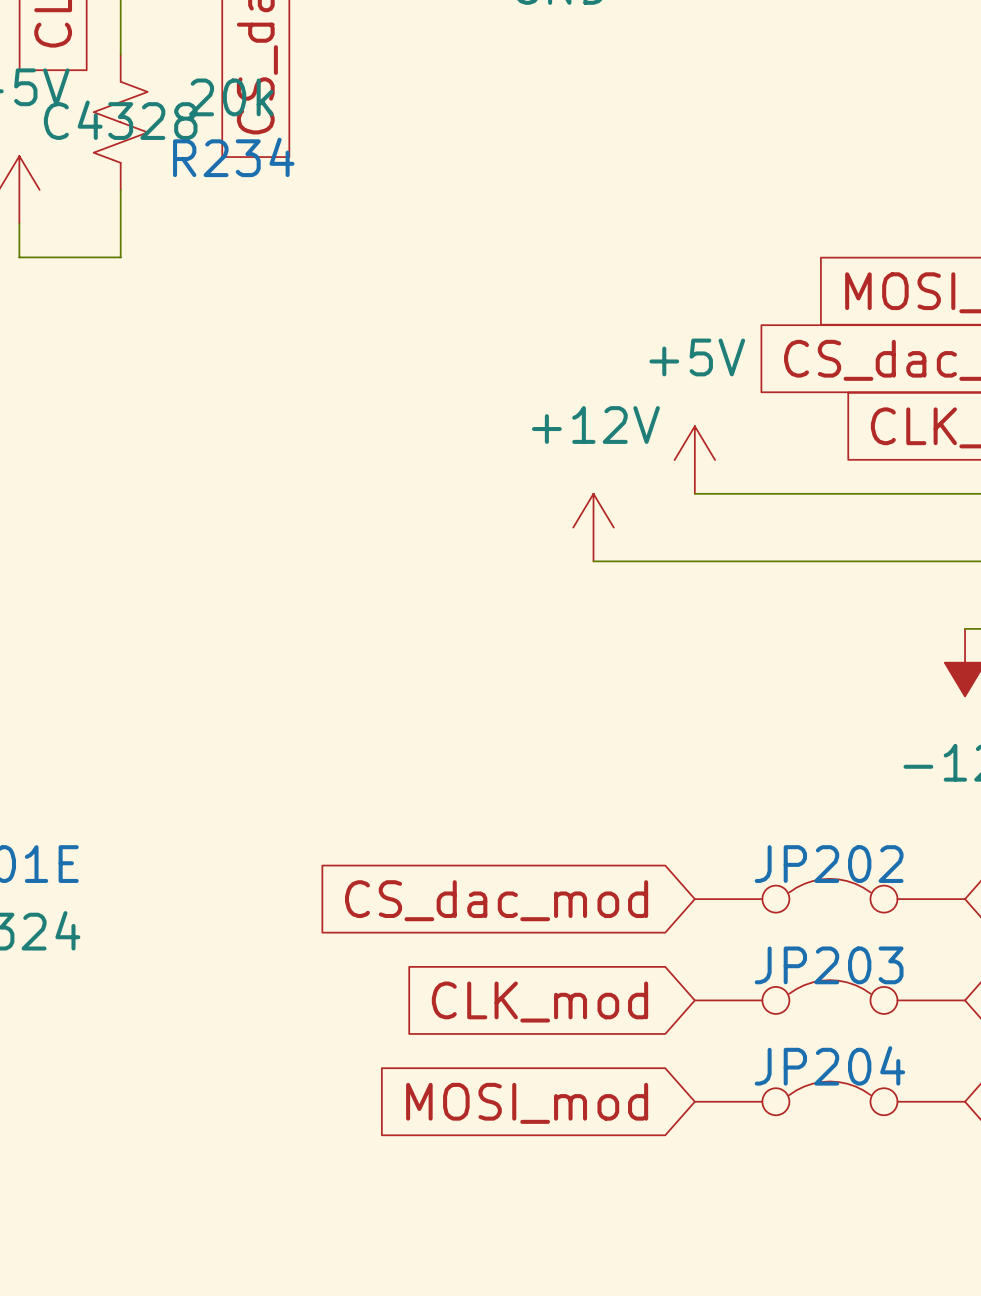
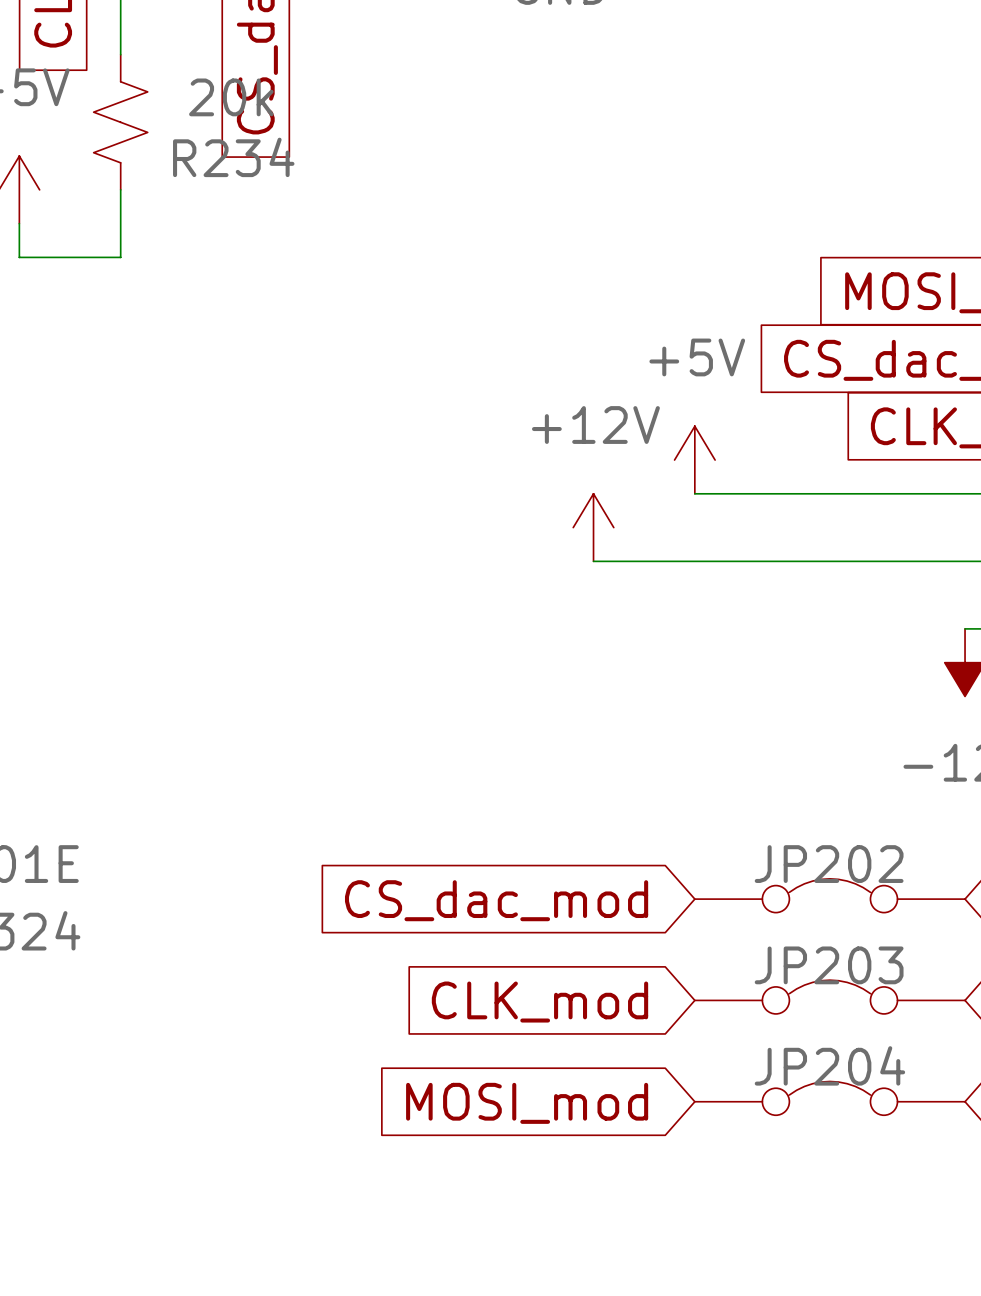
R234 text: C4328 (120, 120) -> none

